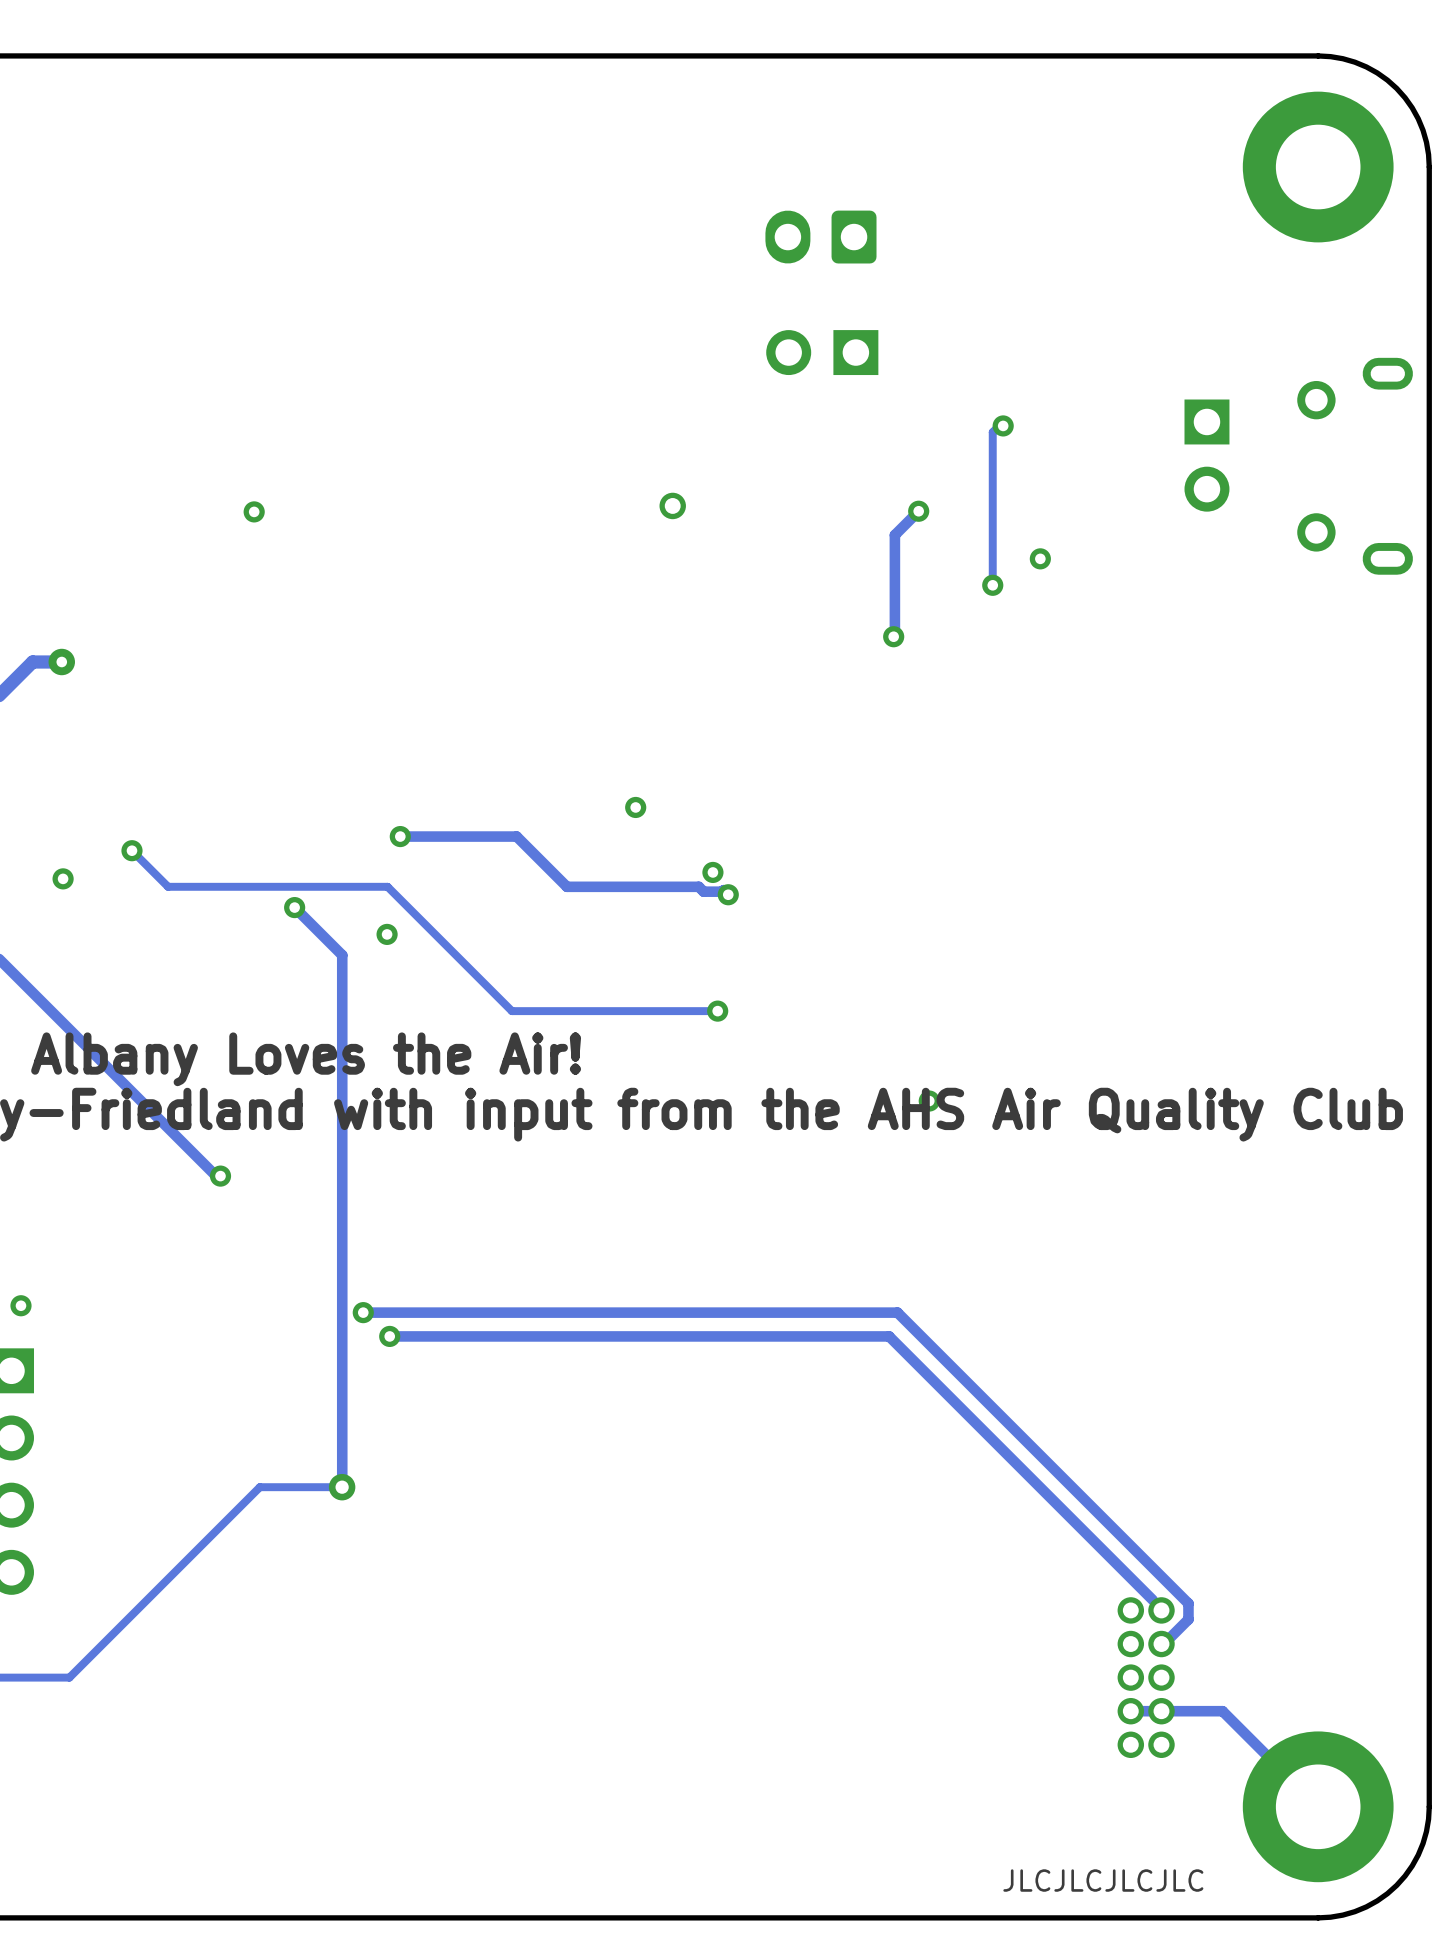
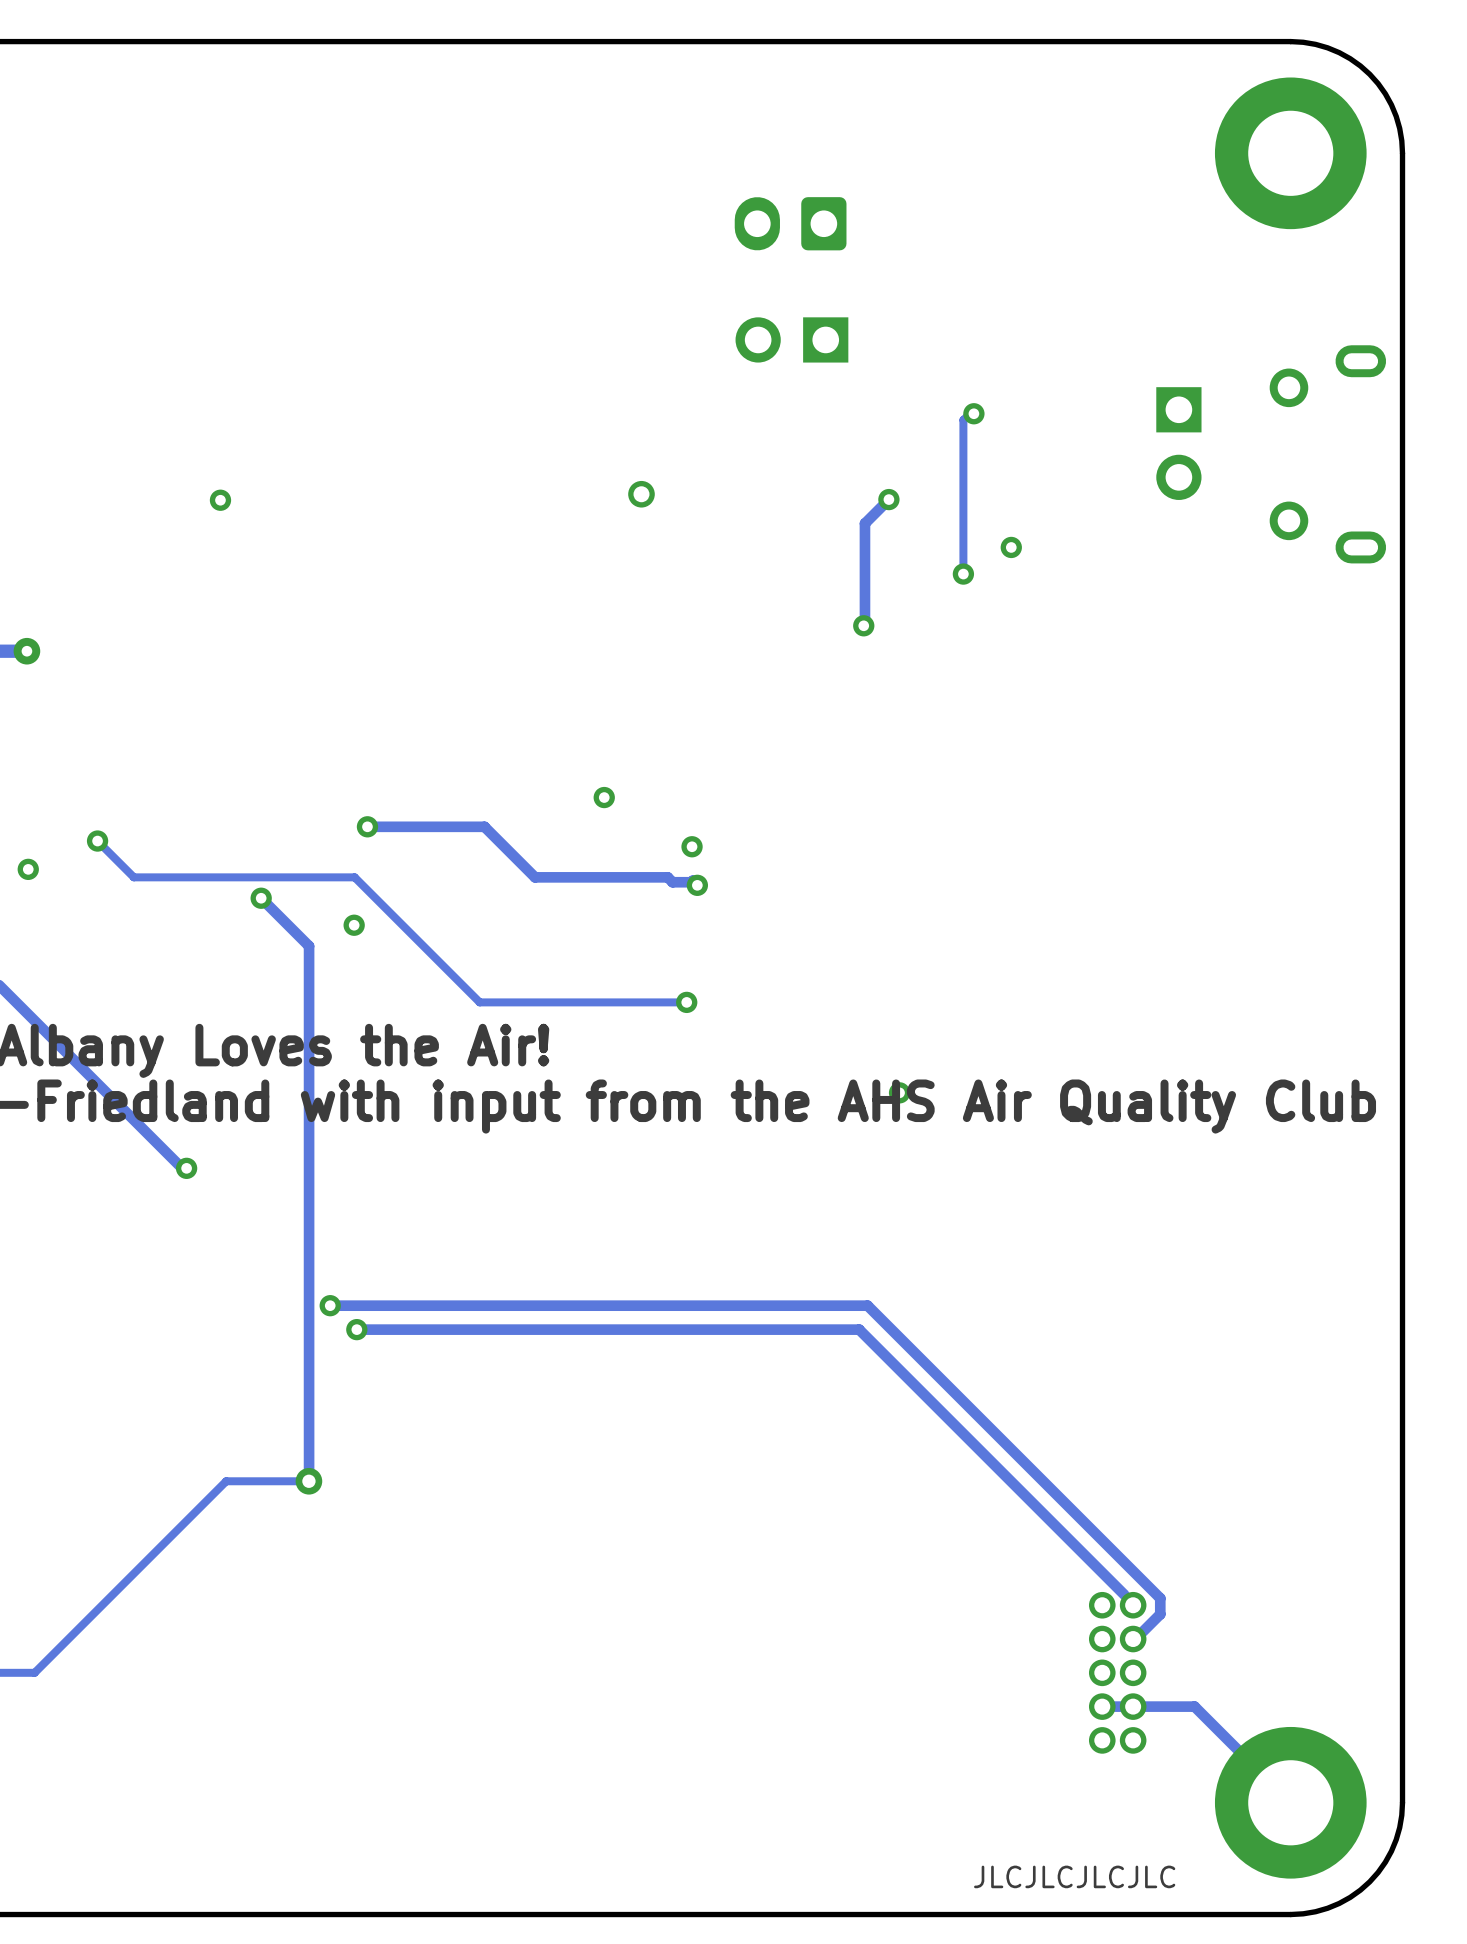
via position: (712, 872) -> (692, 846)

